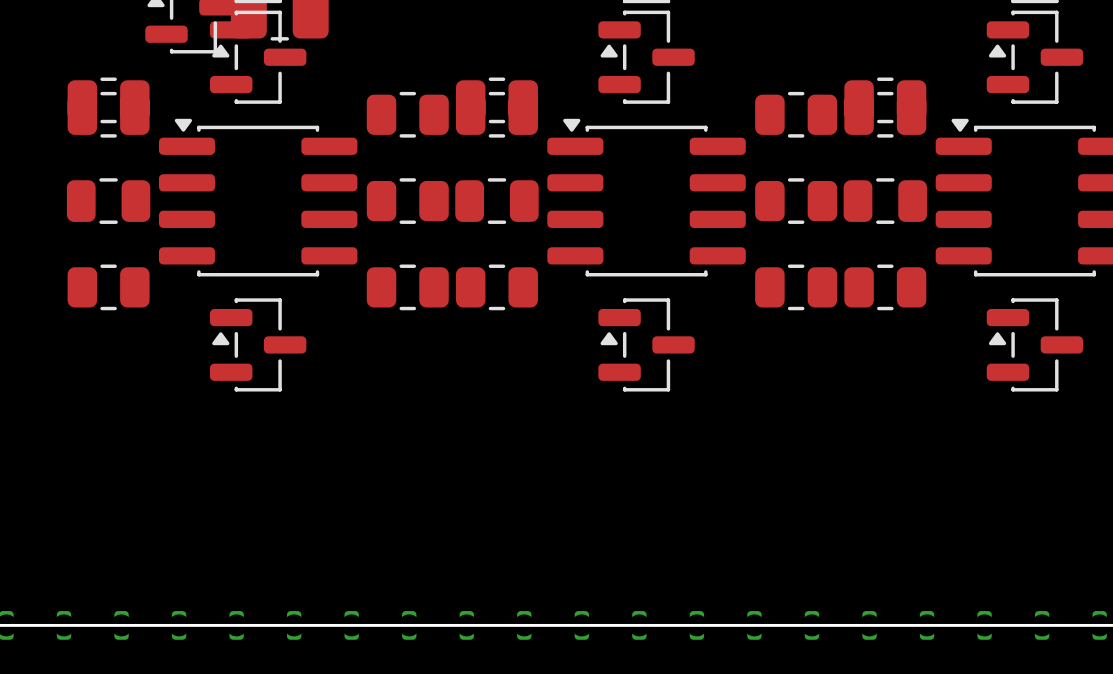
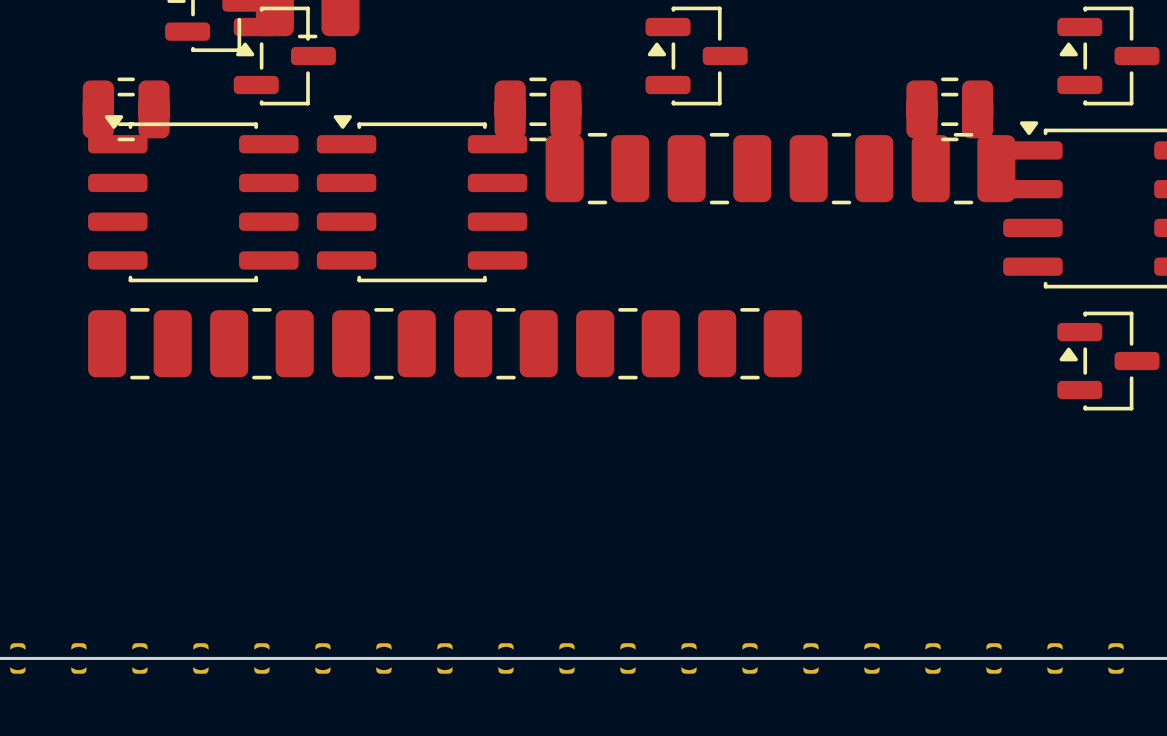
part: (407, 114) -> none
part: (796, 114) -> none
part: none -> (597, 168)
part: none -> (719, 168)
part: none -> (841, 168)
part: none -> (963, 168)
part footprint: [366, 178, 449, 224] -> [316, 115, 528, 283]
part position: (258, 197) -> (193, 198)
part: (646, 197) -> none
part: (108, 201) -> none
part: (496, 201) -> none
part: (796, 201) -> none
part: (885, 201) -> none
part: (108, 287) -> none
part: (407, 287) -> none
part: (496, 287) -> none
part: (796, 287) -> none
part: (885, 287) -> none
part footprint: [210, 298, 307, 392] -> [210, 308, 314, 380]
part: none -> (139, 343)
part: none -> (383, 343)
part: none -> (505, 343)
part: none -> (627, 343)
part: none -> (749, 343)
part: (646, 344) -> none

